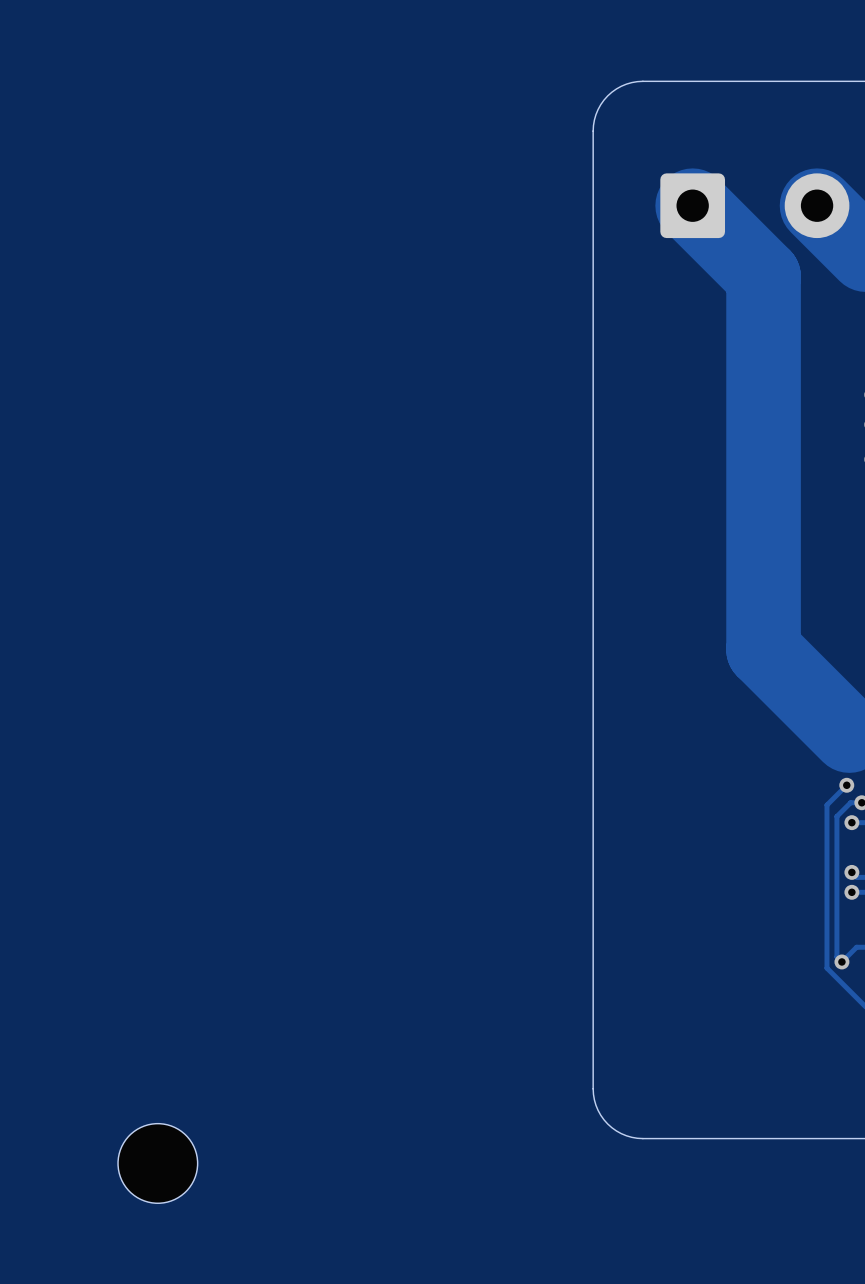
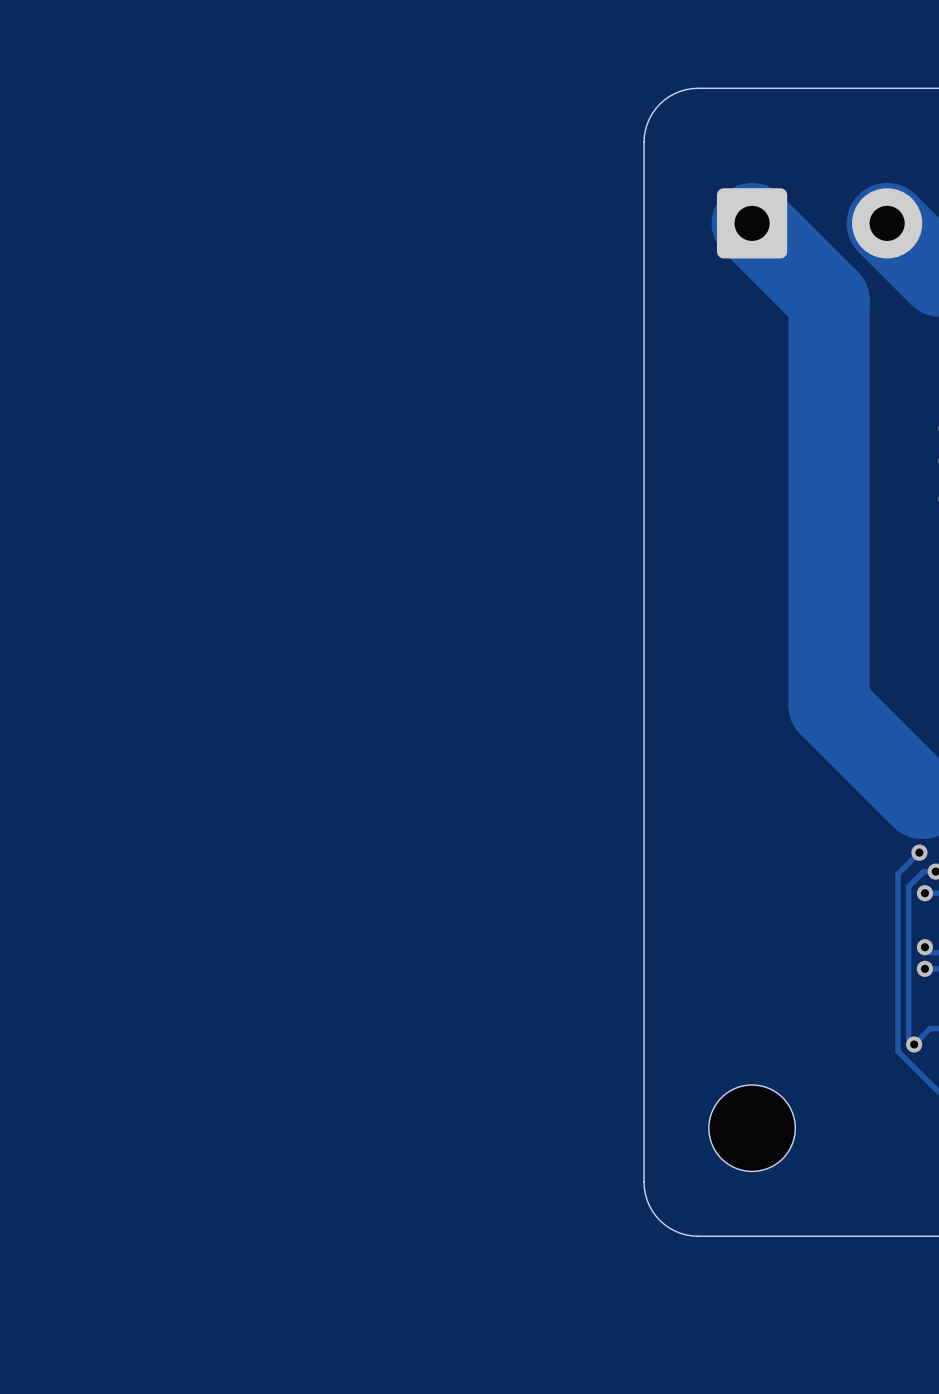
part position: (157, 1163) -> (752, 1128)

